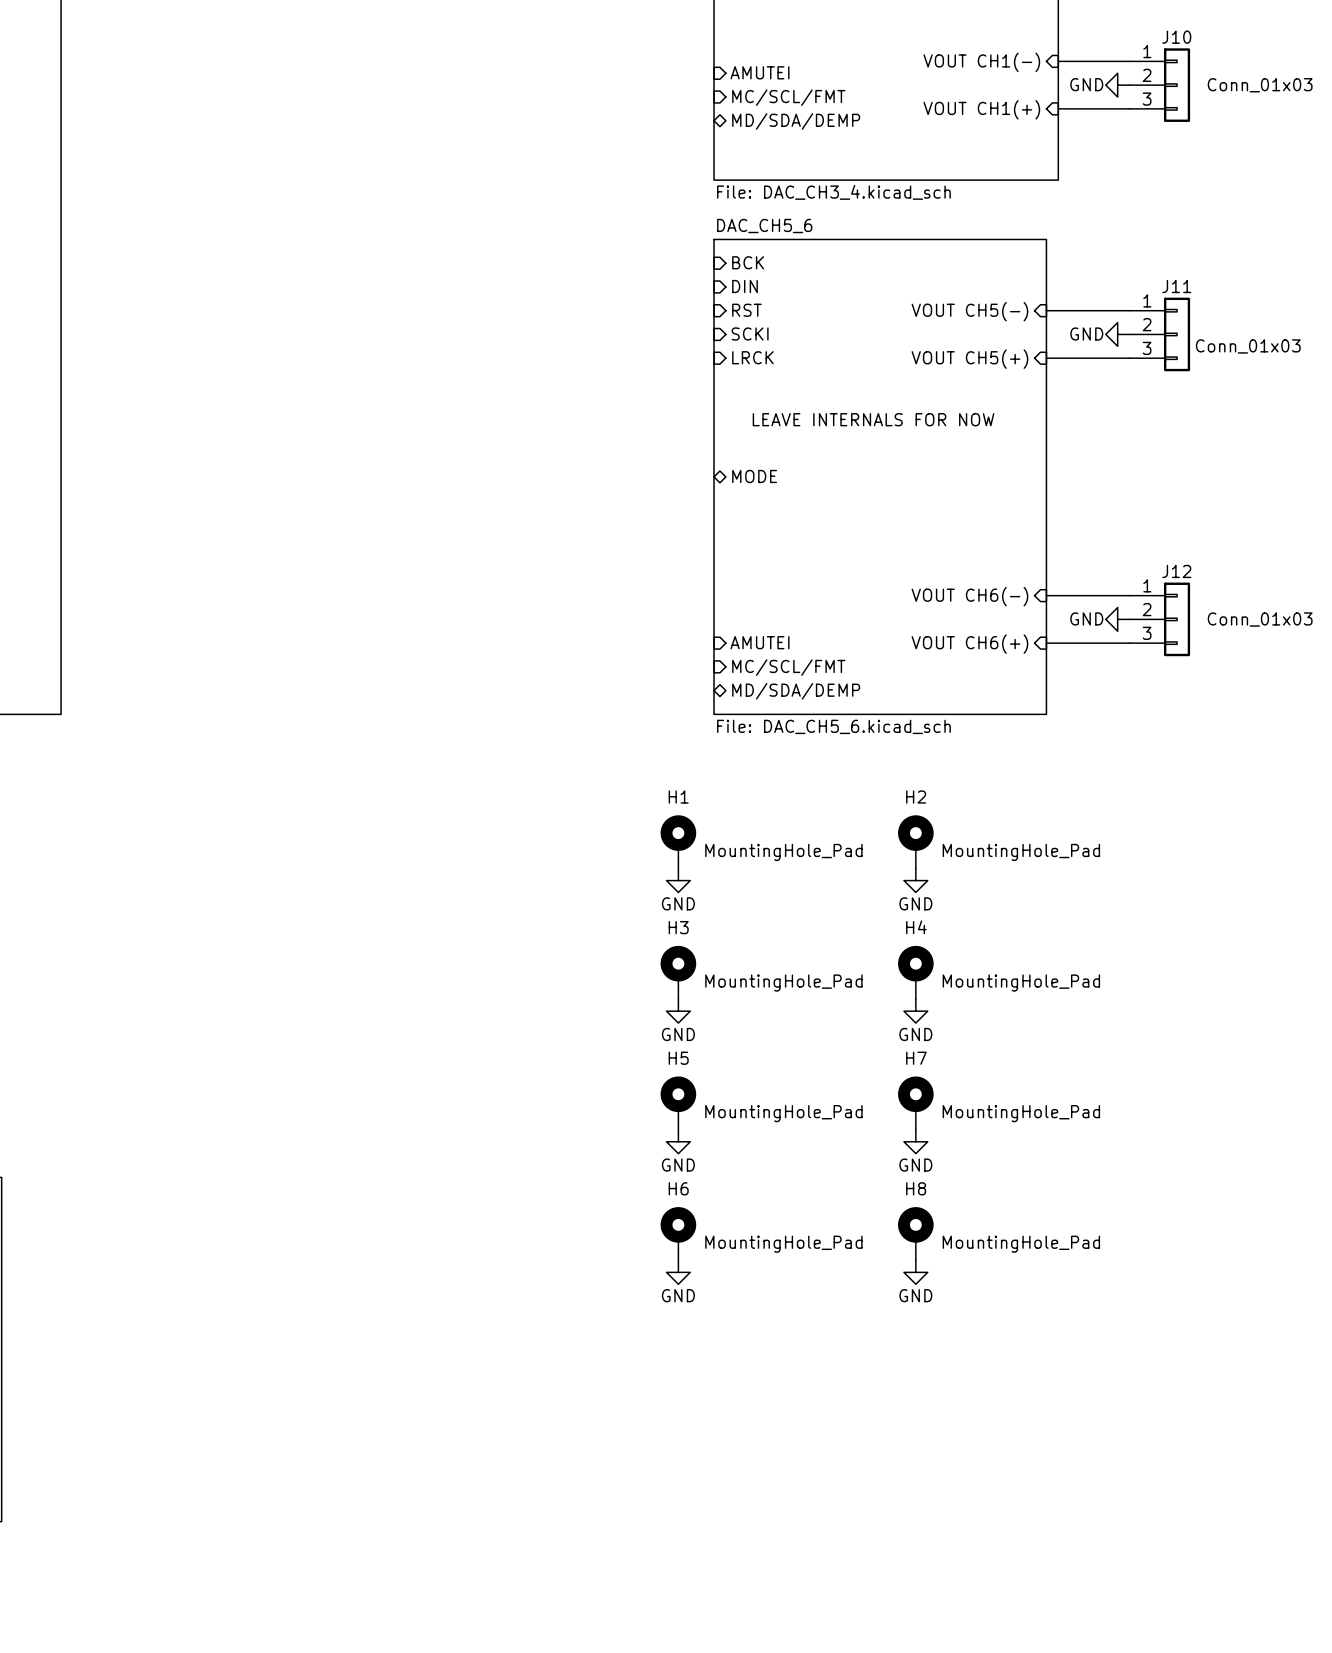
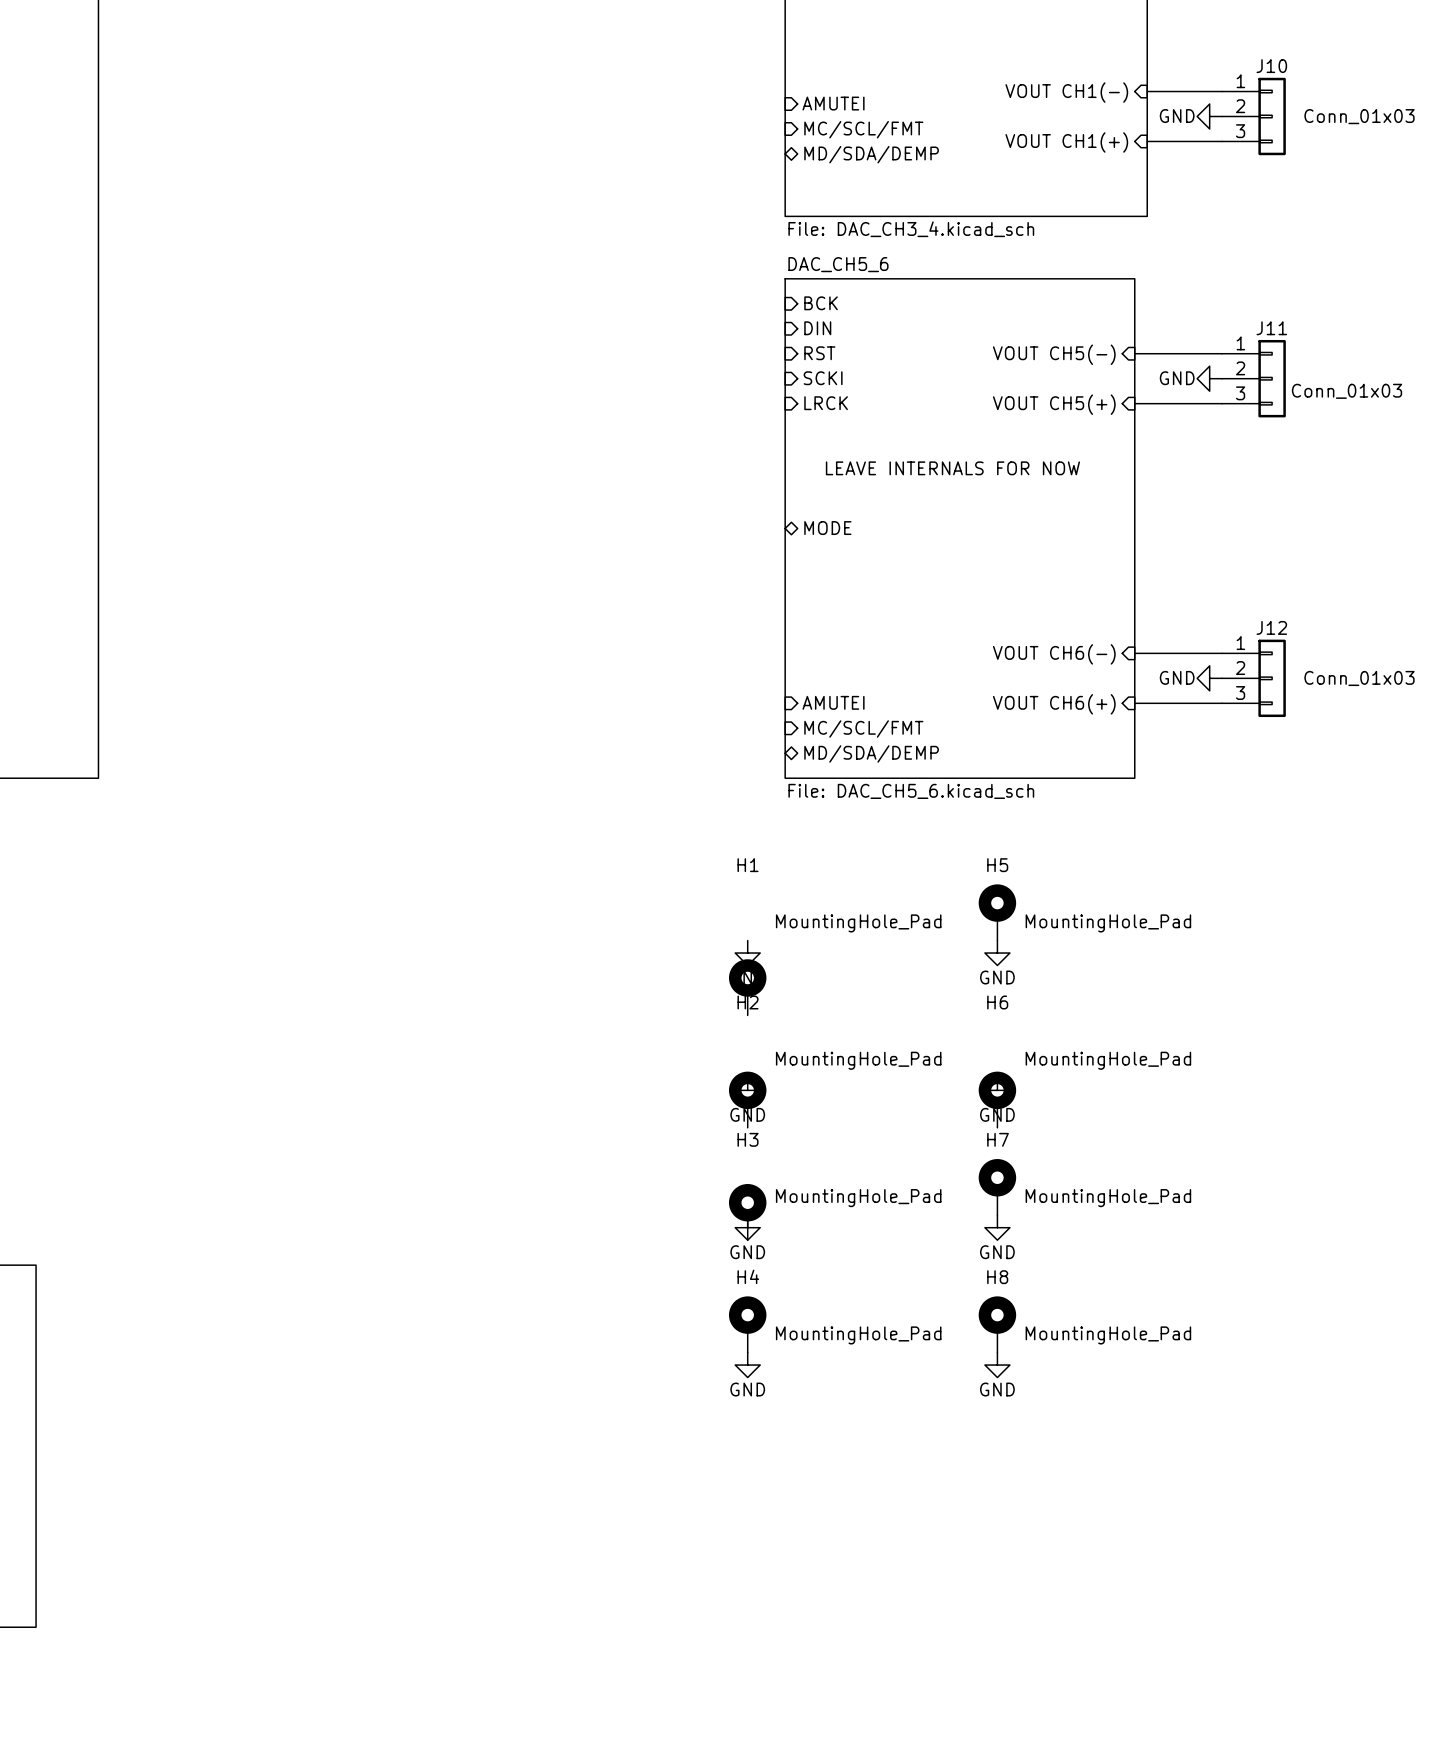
H2 name: H2 (916, 797) -> H5 (997, 865)
H1 position: (678, 842) -> (747, 987)
H3 name position: H3 (678, 927) -> H3 (748, 1139)
H3 position: (678, 972) -> (747, 1212)
H4: MountingHole_Pad (915, 972) -> none
H2: none -> MountingHole_Pad (747, 1099)
H6: none -> MountingHole_Pad (997, 1099)
H5: MountingHole_Pad (678, 1103) -> none
H6 name: H6 (678, 1188) -> H4 (748, 1276)

